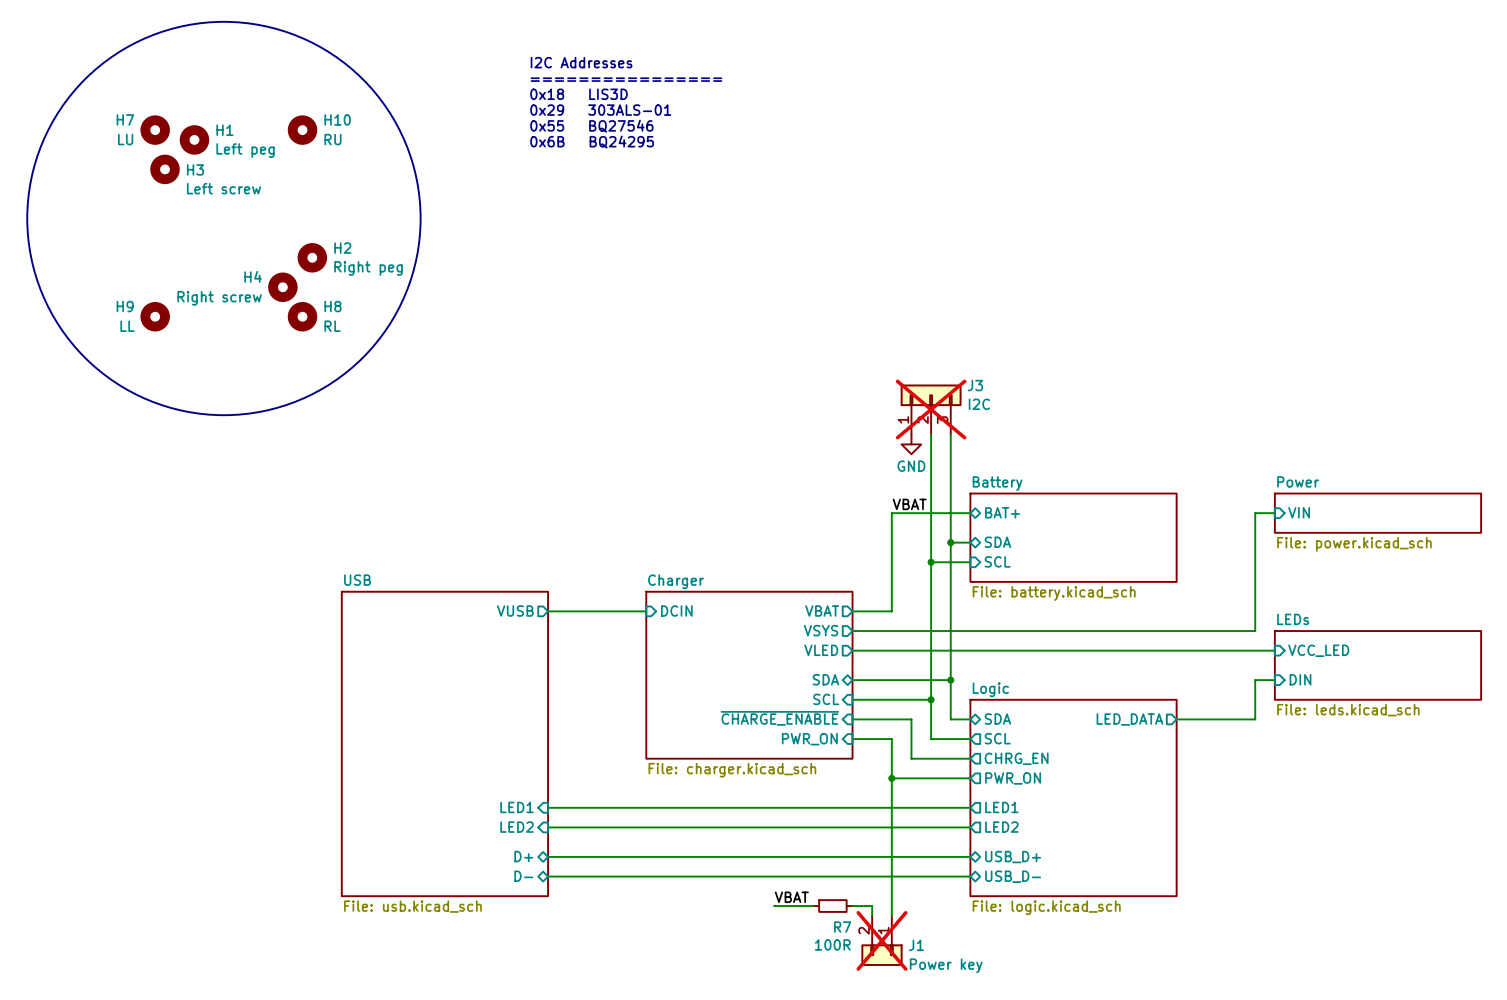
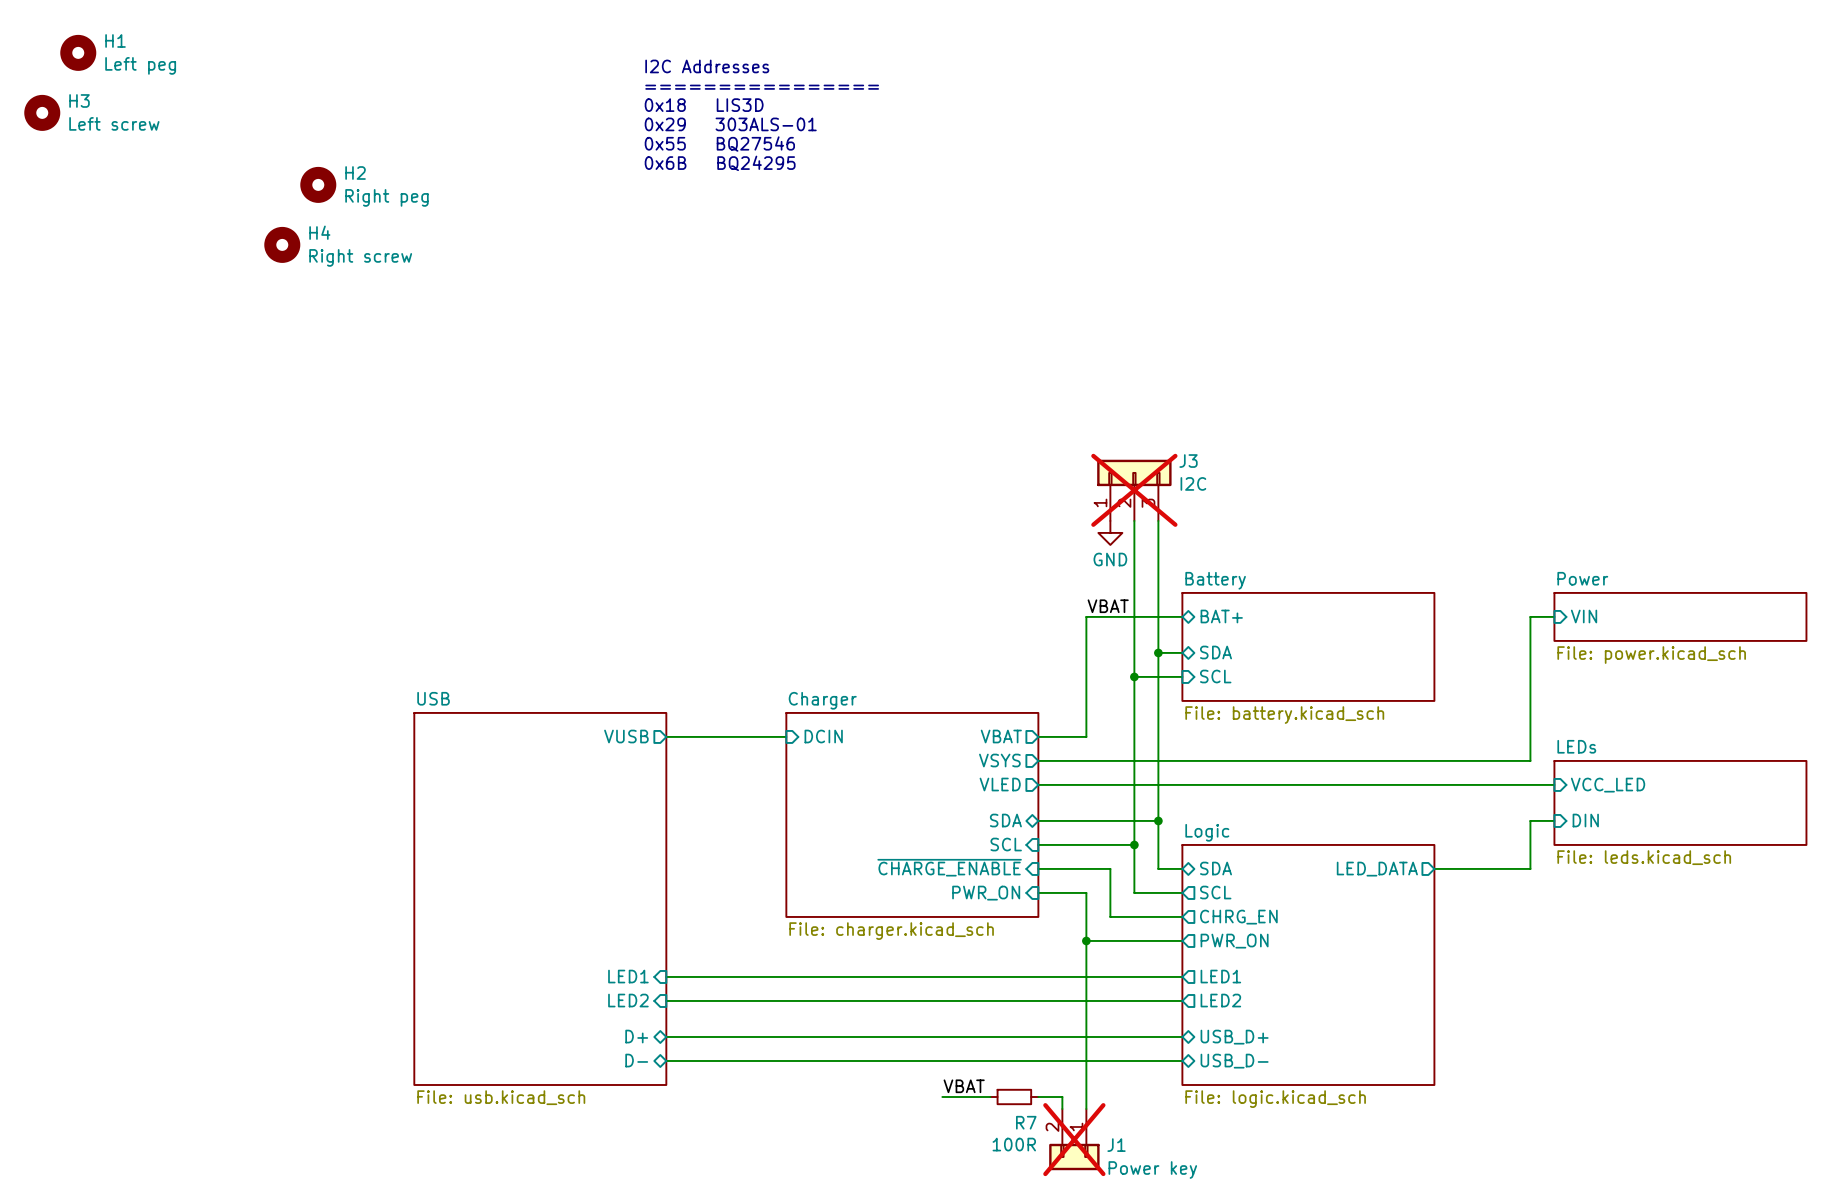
drawing: [27, 21, 421, 416] -> none
H7: LU (155, 130) -> none
H10: RU (302, 130) -> none
H1 position: (194, 139) -> (78, 52)
H3 position: (165, 169) -> (42, 112)
H3 name position: H3 (195, 169) -> H3 (79, 100)
H3 value position: Left screw (224, 188) -> Left screw (114, 123)
H2 position: (312, 257) -> (318, 184)
H4 name position: H4 (253, 276) -> H4 (319, 232)
H4 position: (282, 287) -> (282, 244)
H4 value position: Right screw (219, 298) -> Right screw (360, 257)
H9: LL (155, 316) -> none
H8: RL (302, 316) -> none

